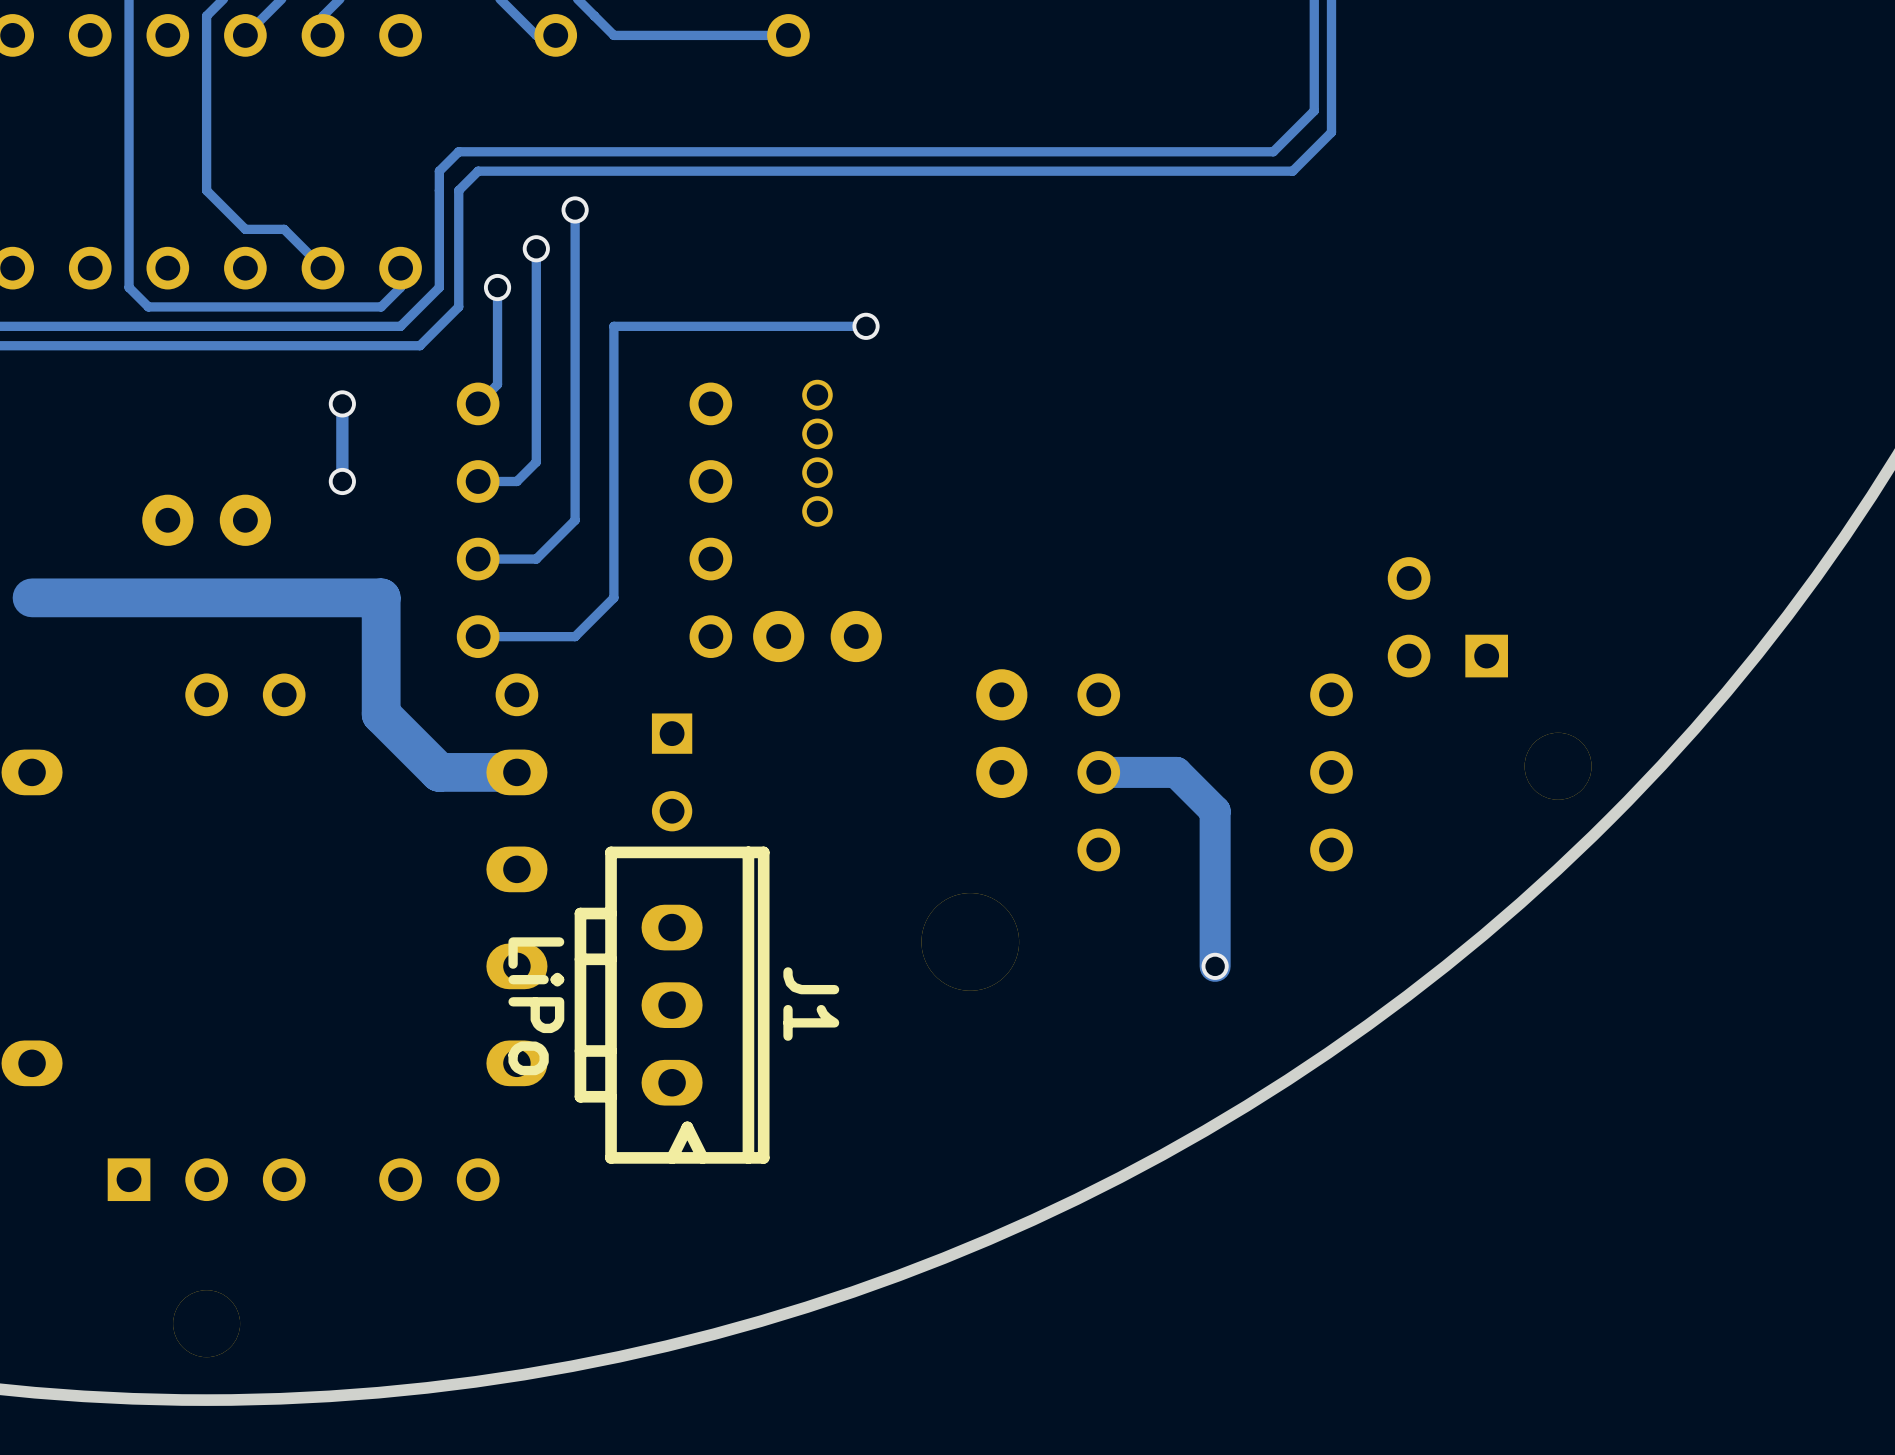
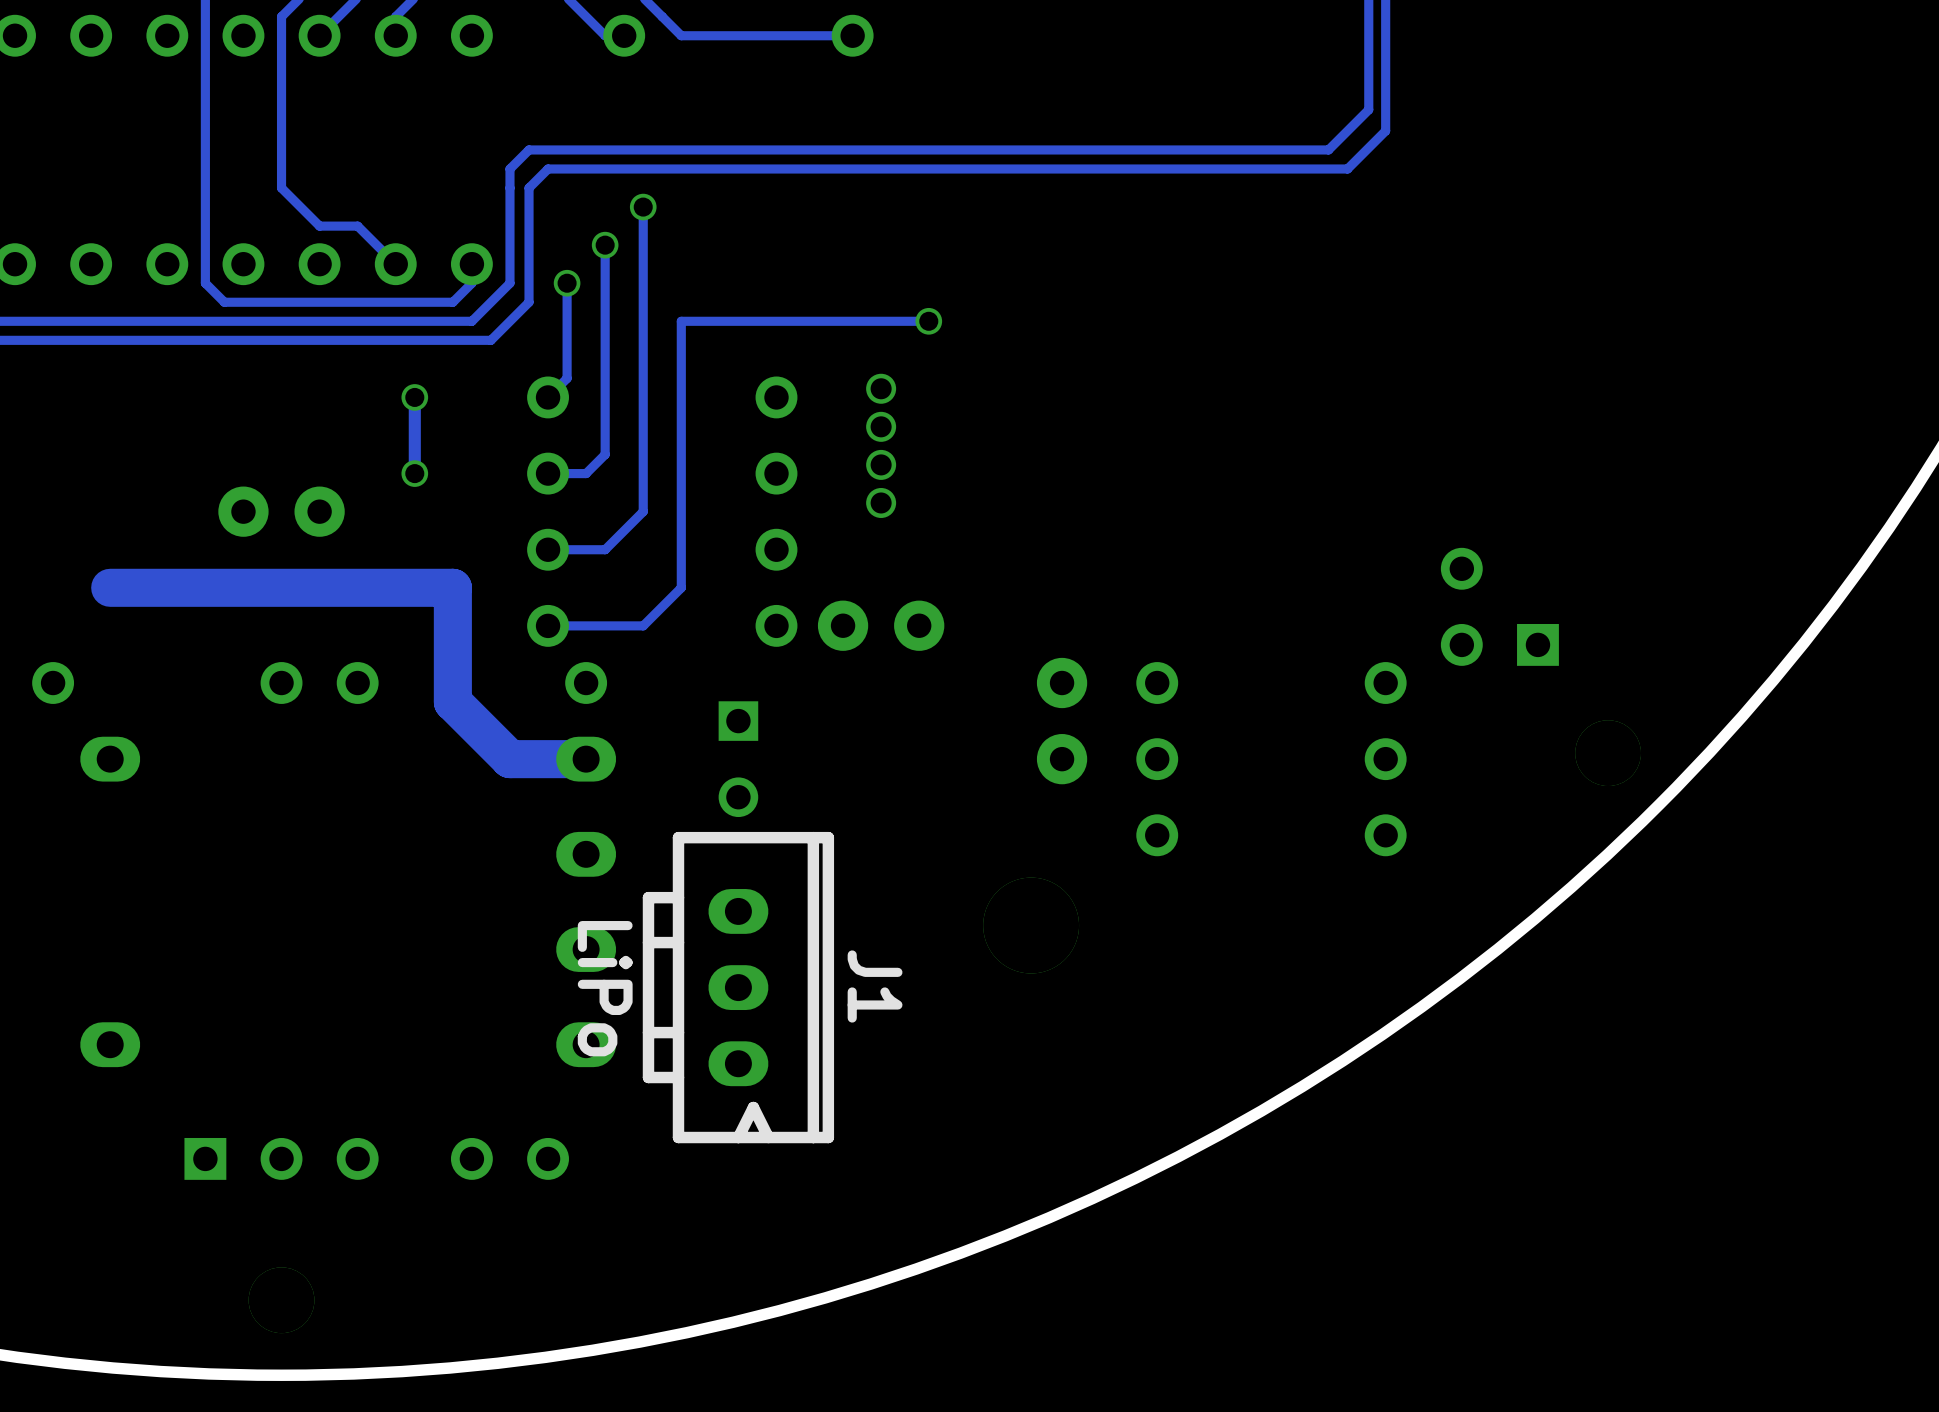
track: (1098, 772) (1176, 772) (1215, 811) (1215, 966) -> none
via: (1215, 966) -> none

